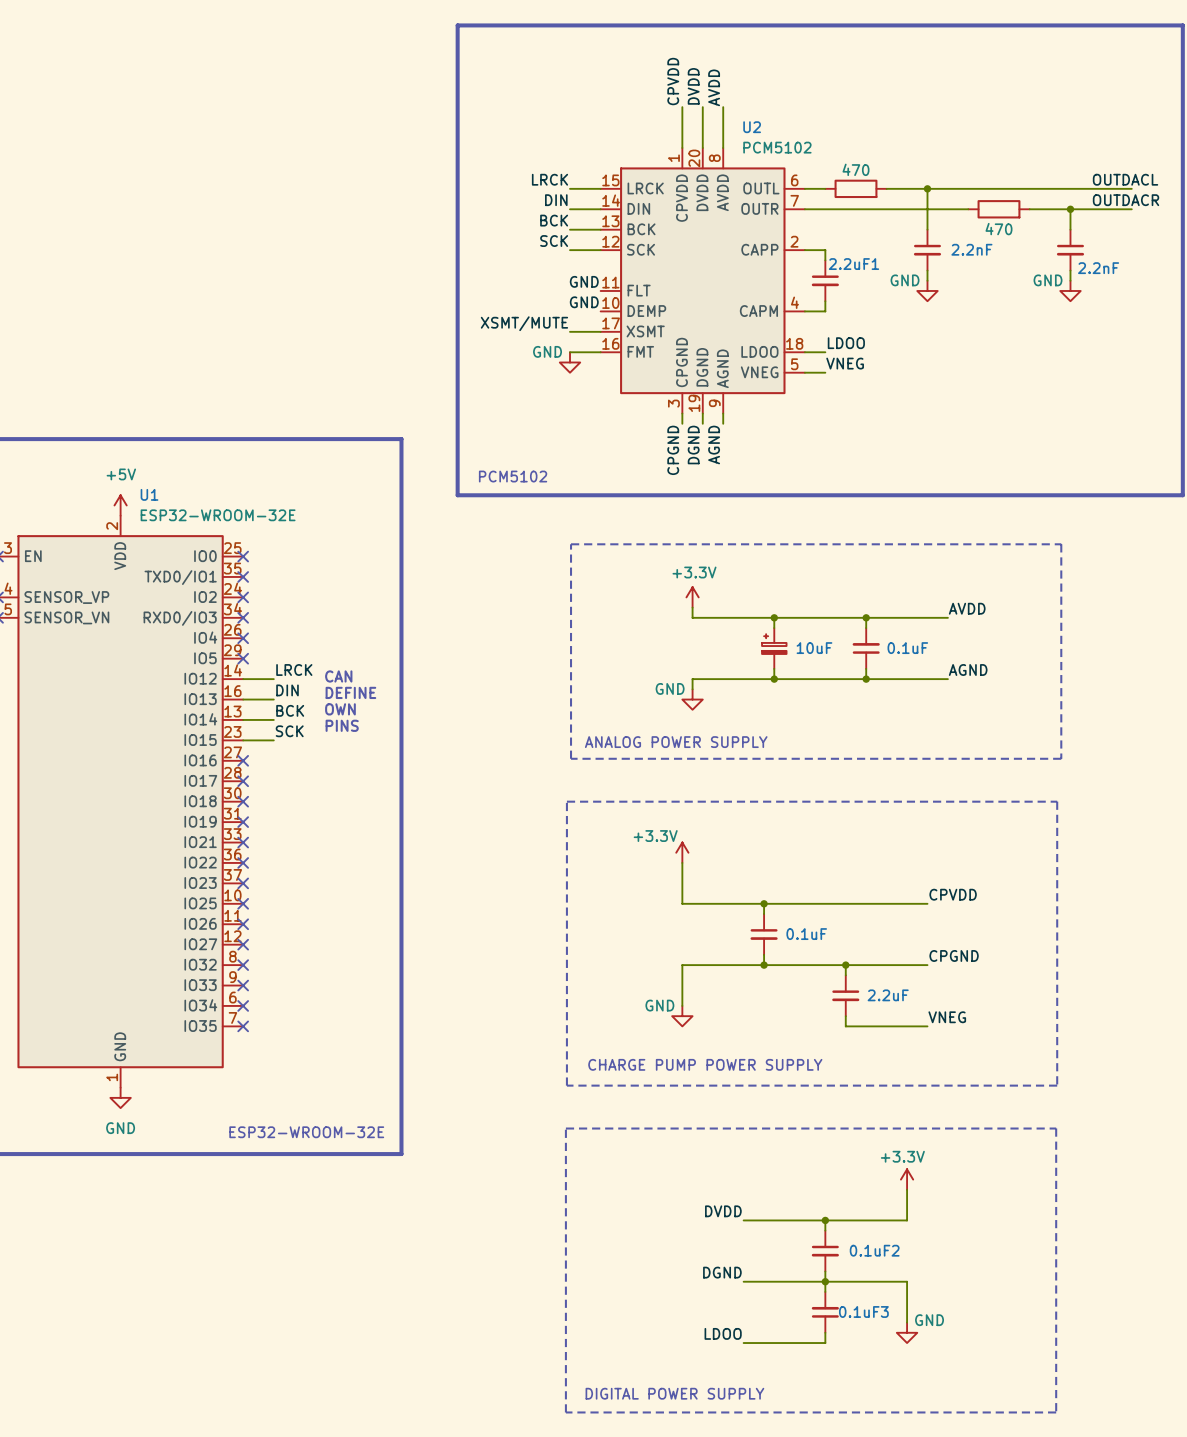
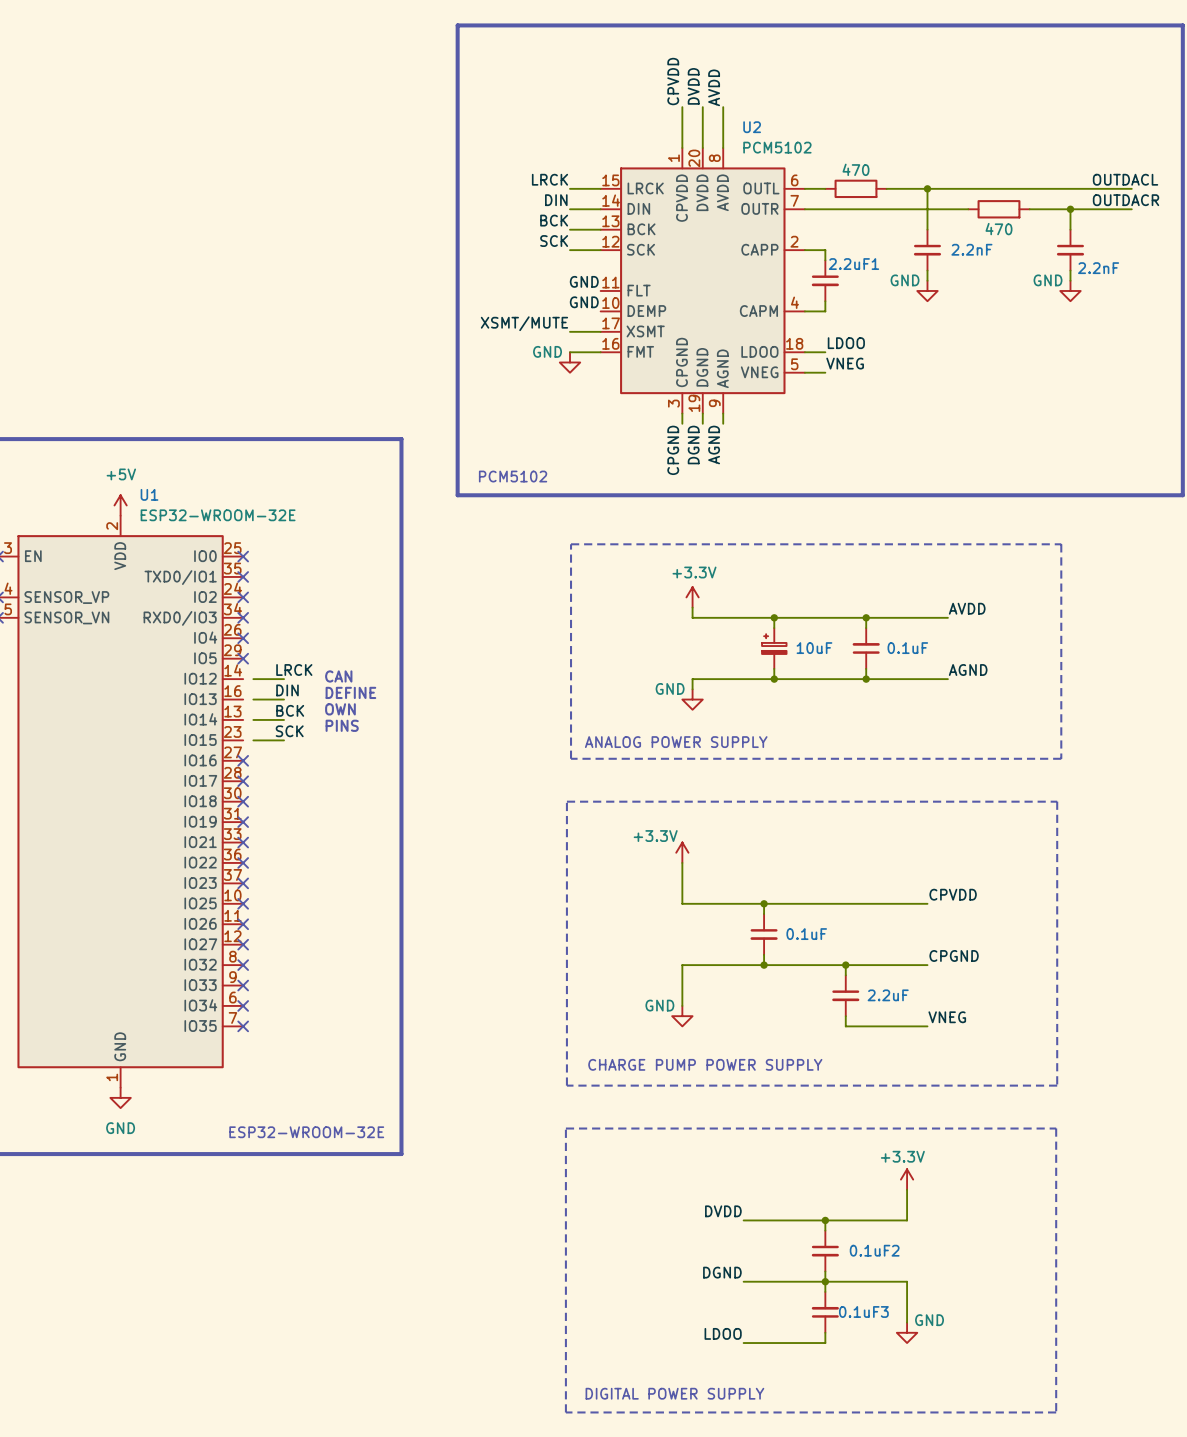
wire: (243, 679) (253, 679) -> (273, 679) (284, 679)
wire: (243, 699) (253, 699) -> (273, 699) (284, 699)
wire: (243, 719) (253, 719) -> (273, 719) (284, 719)
wire: (243, 740) (253, 740) -> (273, 740) (284, 740)

